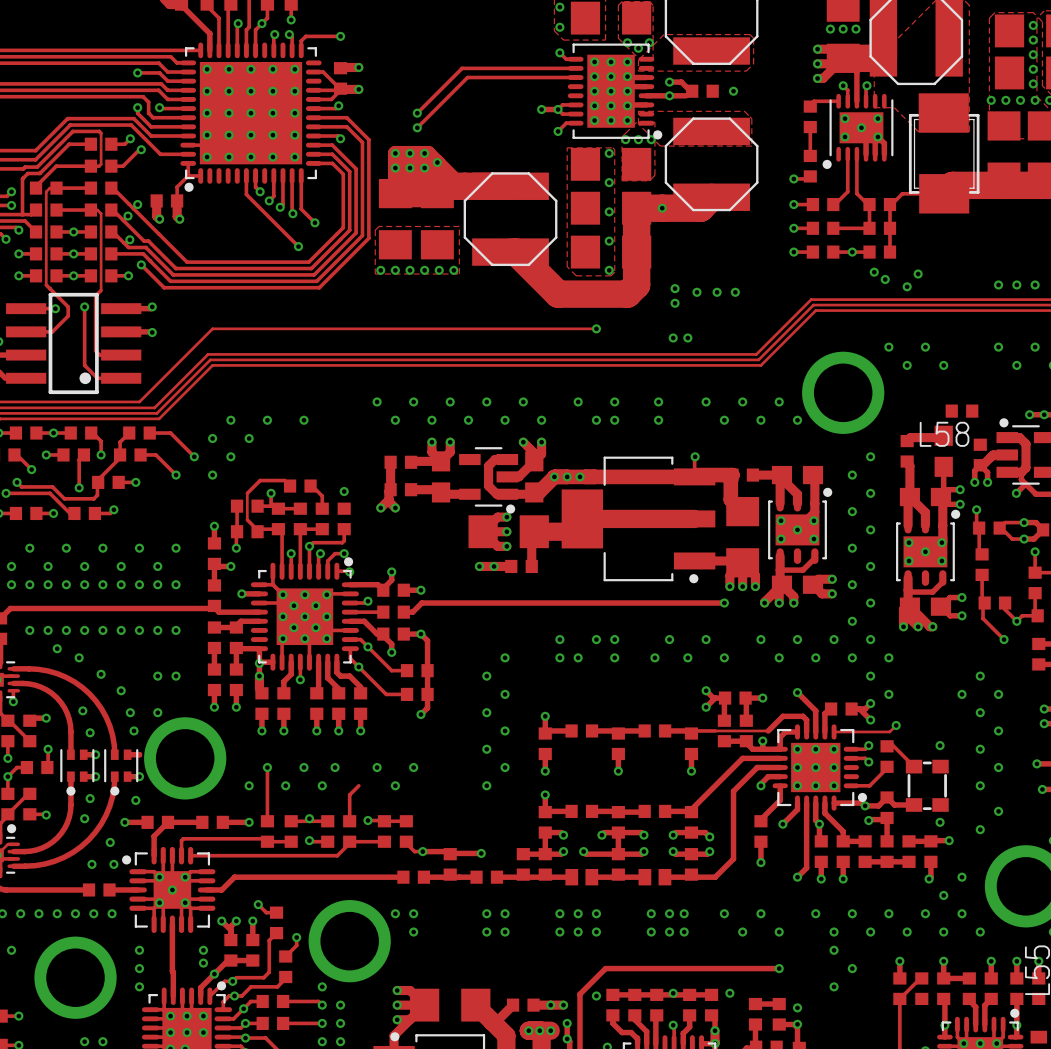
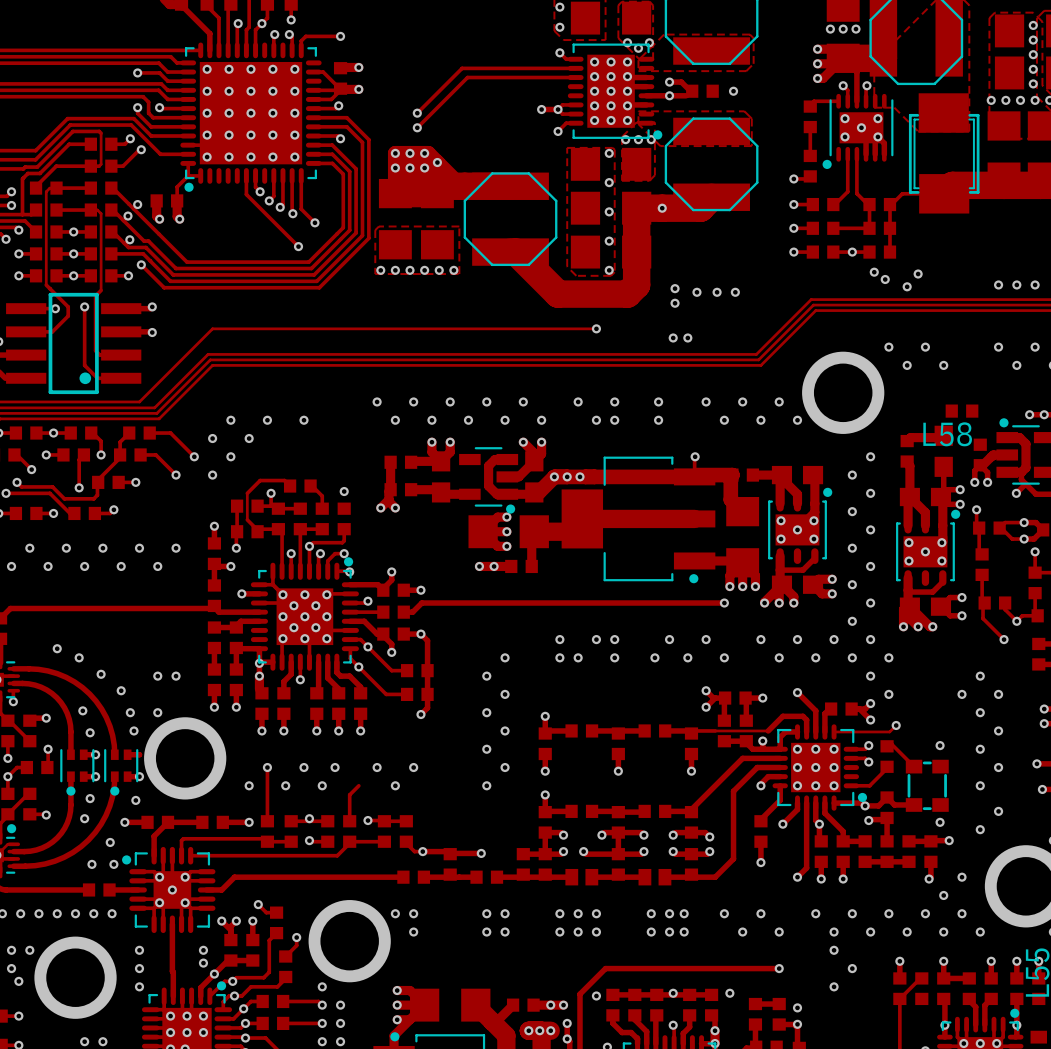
via: (11, 584) -> none
via: (29, 584) -> none
via: (48, 584) -> none
via: (66, 584) -> none
via: (84, 584) -> none
via: (102, 584) -> none
via: (121, 584) -> none
via: (139, 584) -> none
via: (157, 584) -> none
via: (176, 584) -> none
via: (29, 630) -> none
via: (48, 630) -> none
via: (66, 630) -> none
via: (84, 630) -> none
via: (102, 630) -> none
via: (121, 630) -> none
via: (139, 630) -> none
via: (157, 630) -> none
via: (176, 630) -> none
via: none -> (29, 950)
via: none -> (11, 968)
via: none -> (18, 981)

